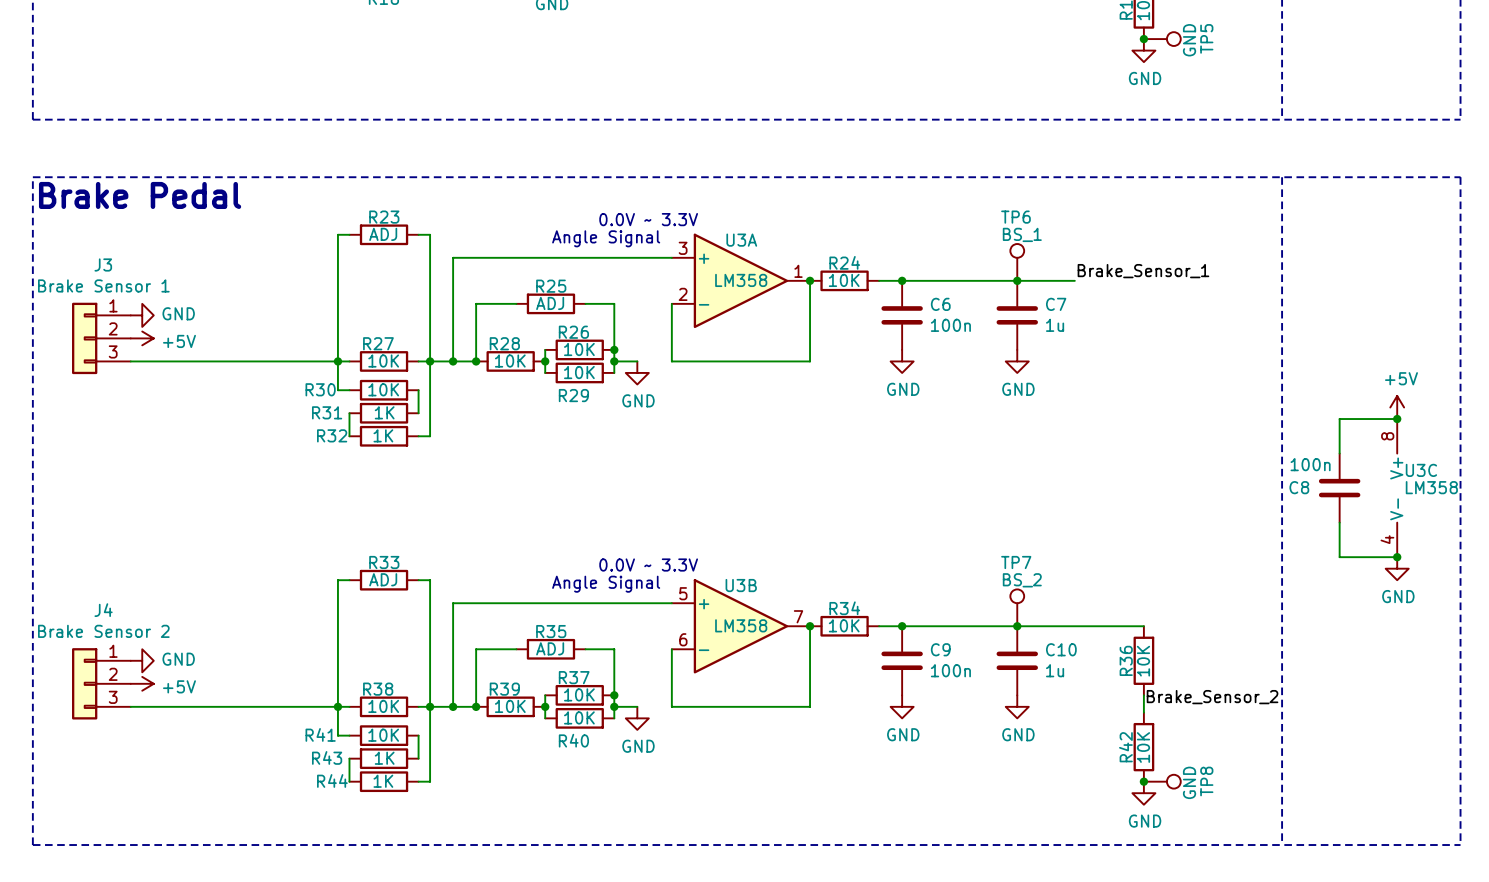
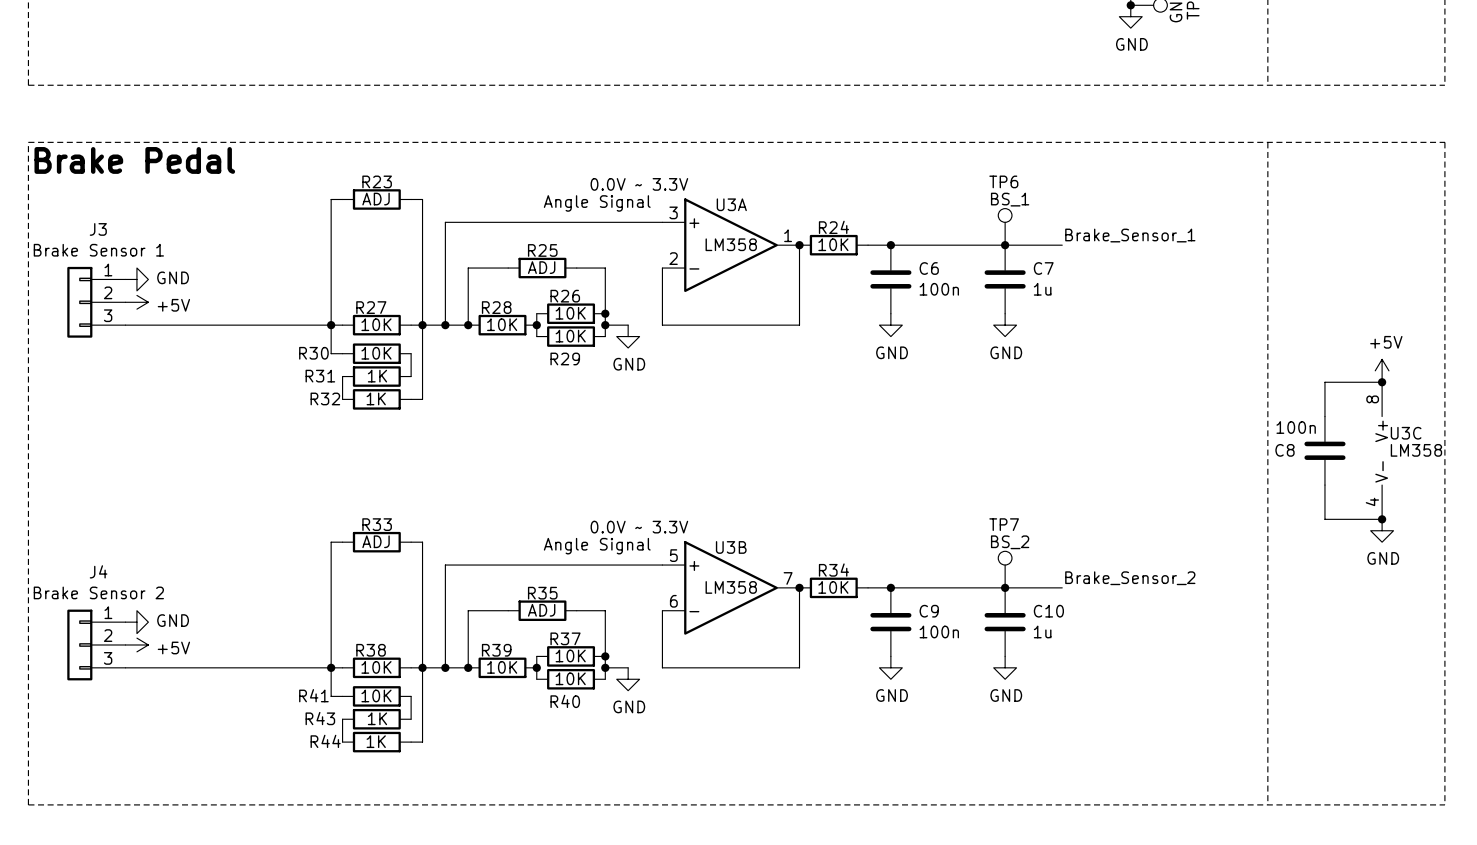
wire: (1074, 626) (1143, 626) -> none
R36: 10K (1143, 660) -> none
wire: (1143, 695) (1143, 712) -> none
label position: Brake_Sensor_2 (1212, 697) -> Brake_Sensor_2 (1130, 578)
R42: 10K (1143, 747) -> none
junction: (1143, 781) -> none
TP8: GND (1162, 781) -> none
power symbol: GND (1143, 793) -> none

